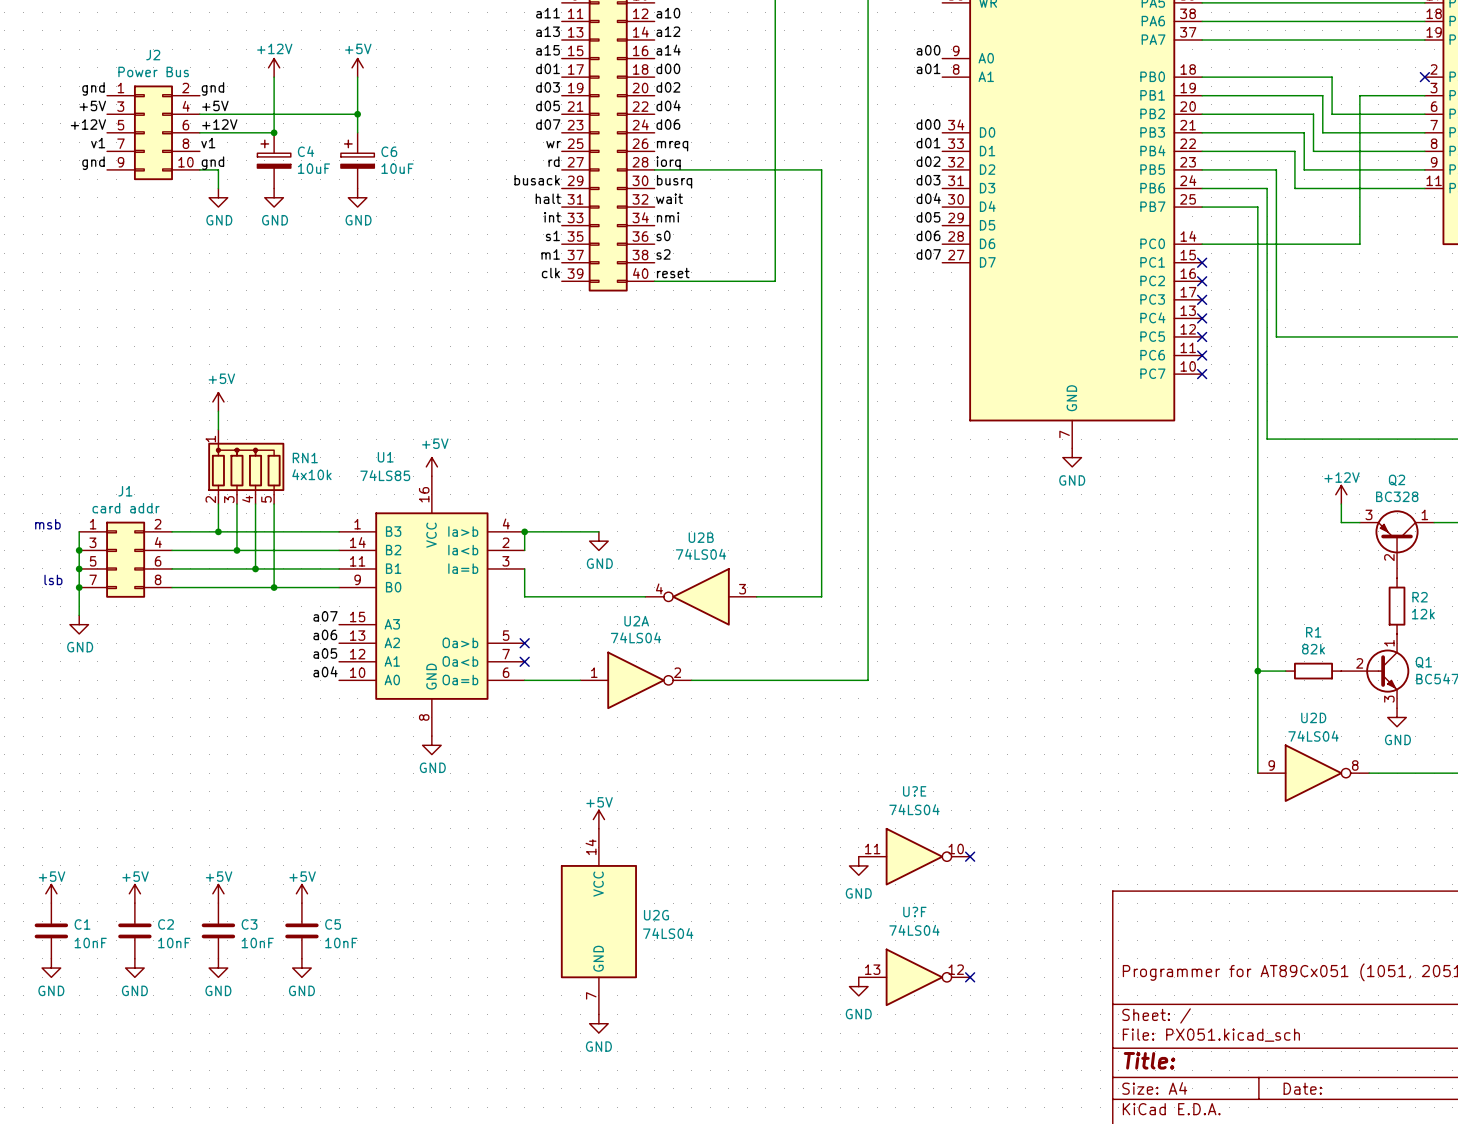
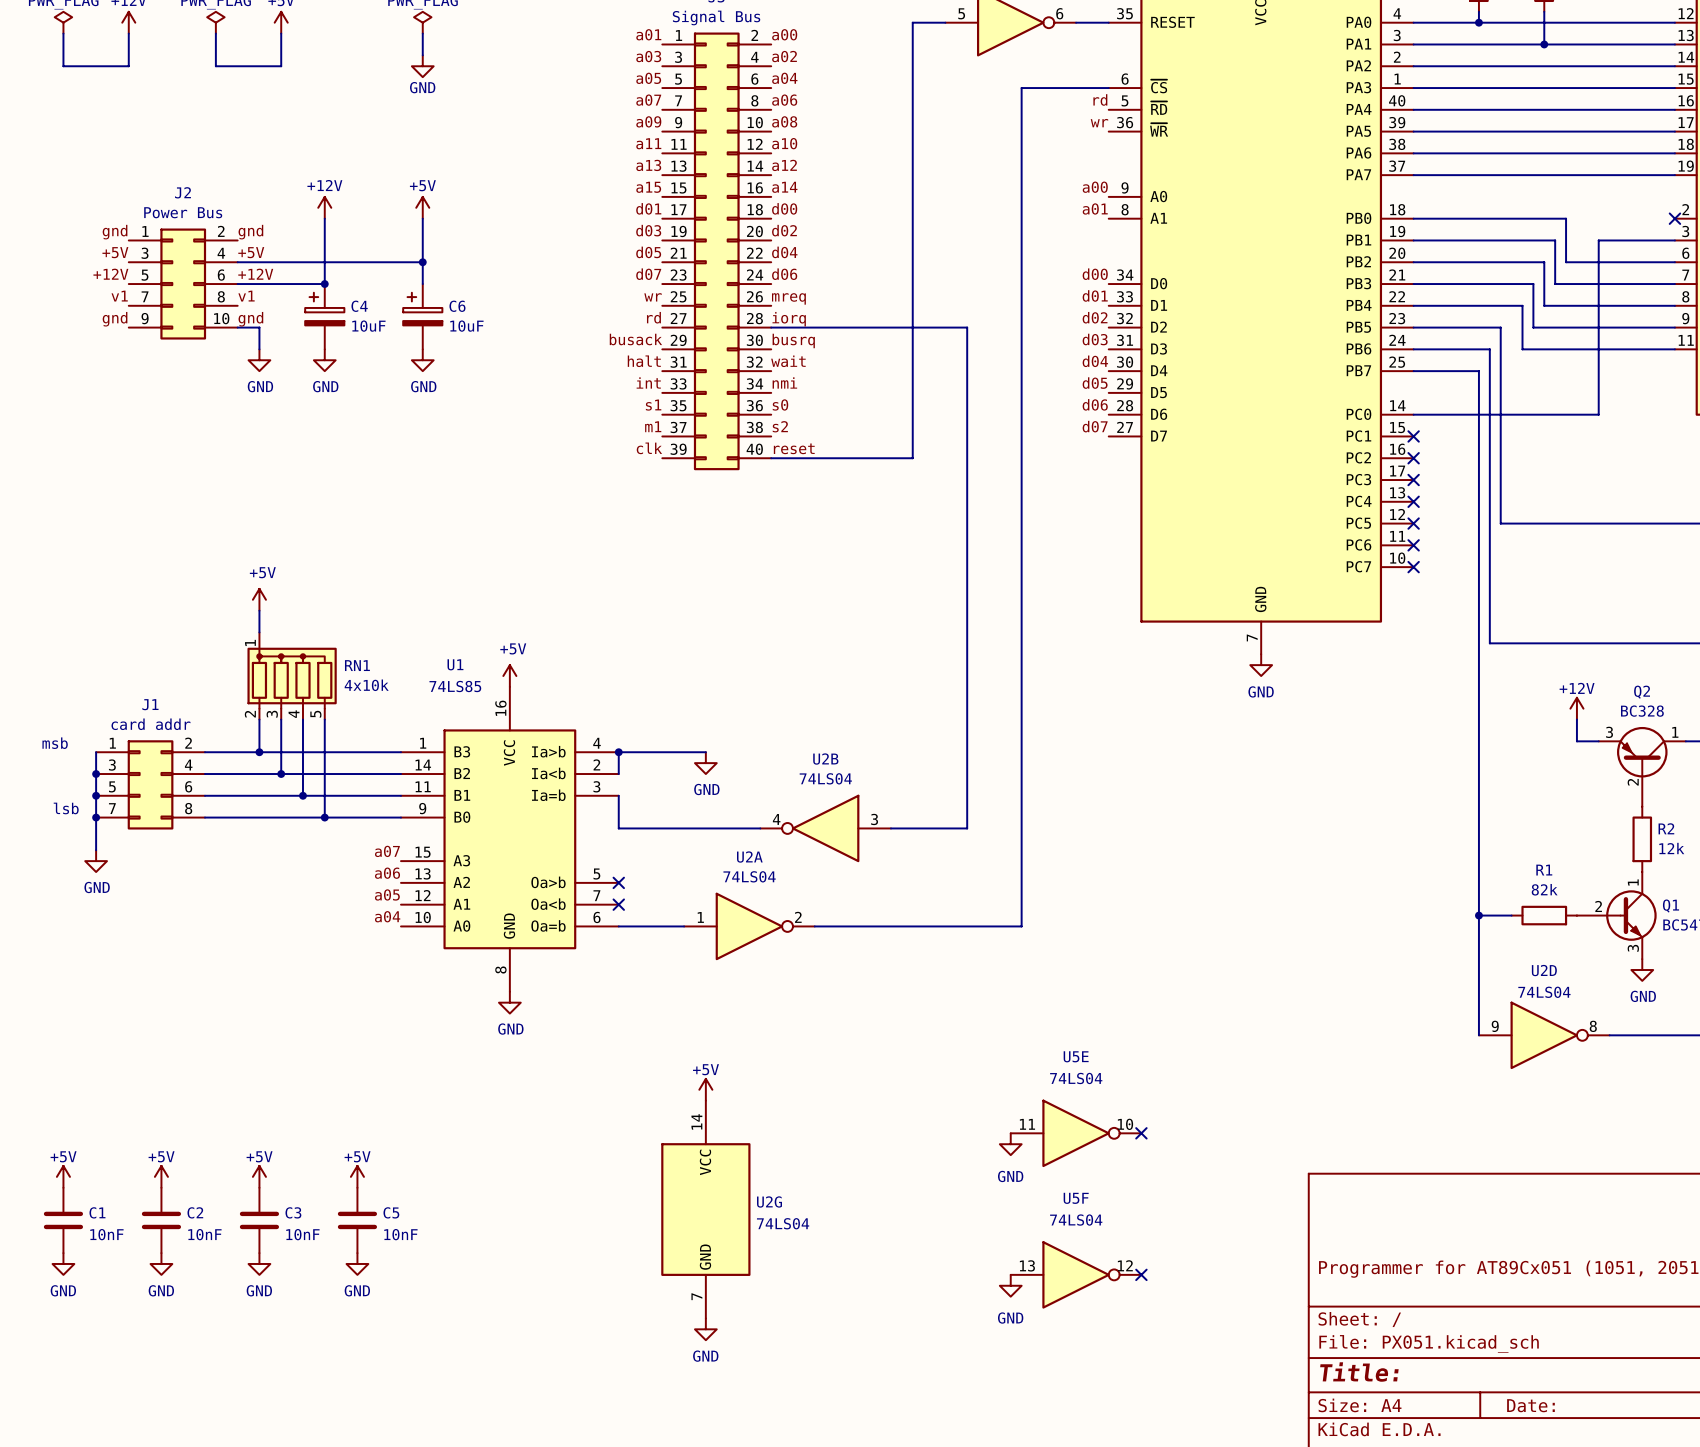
U?E name: U?E (914, 791) -> U5E (1076, 1056)
U?F name: U?F (914, 912) -> U5F (1076, 1198)

